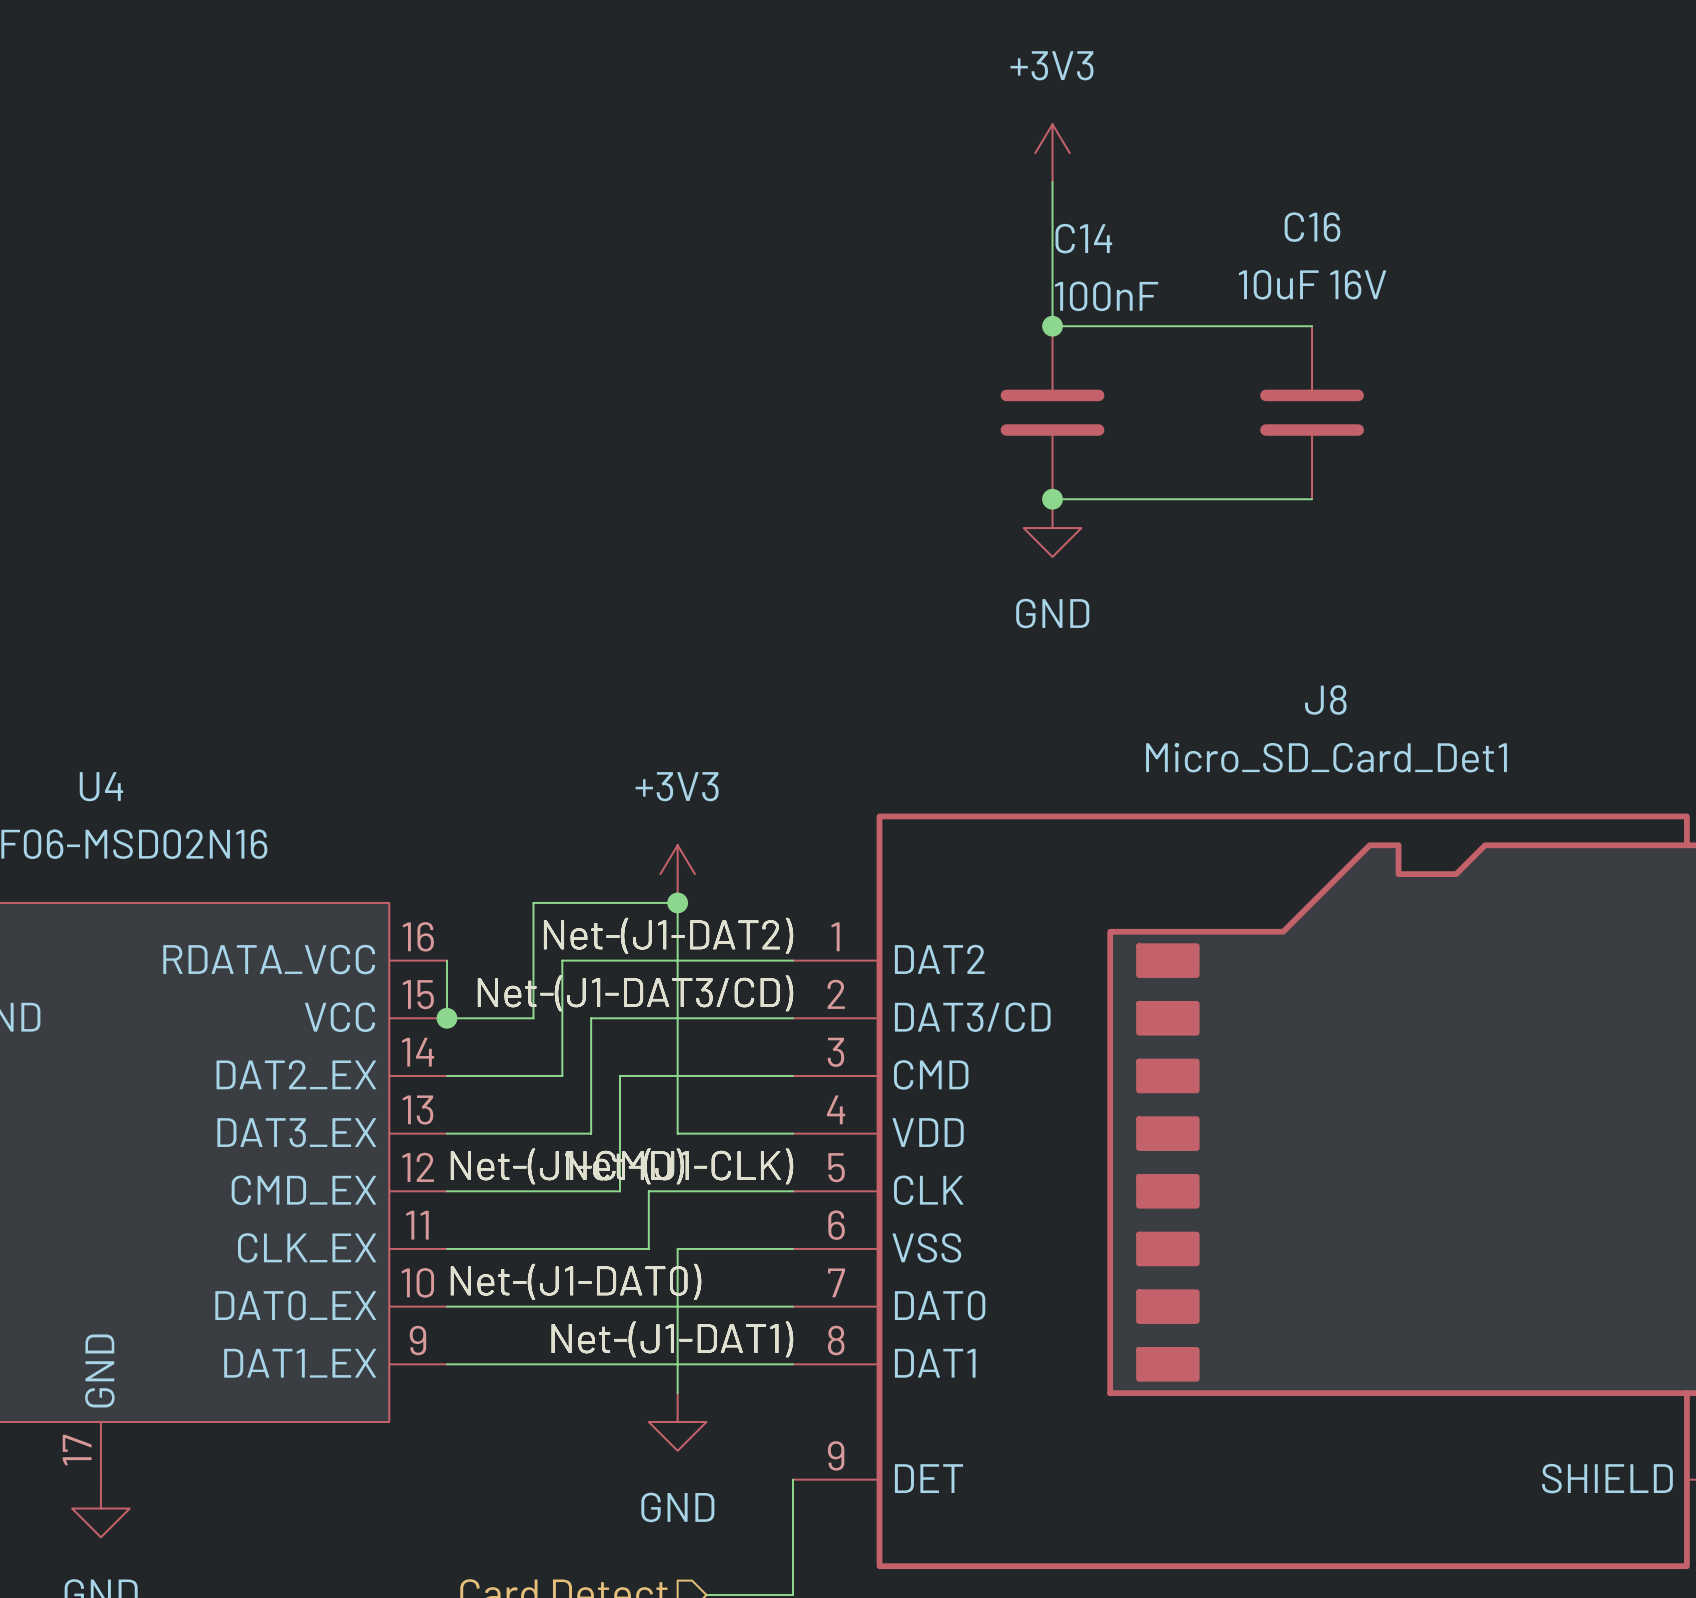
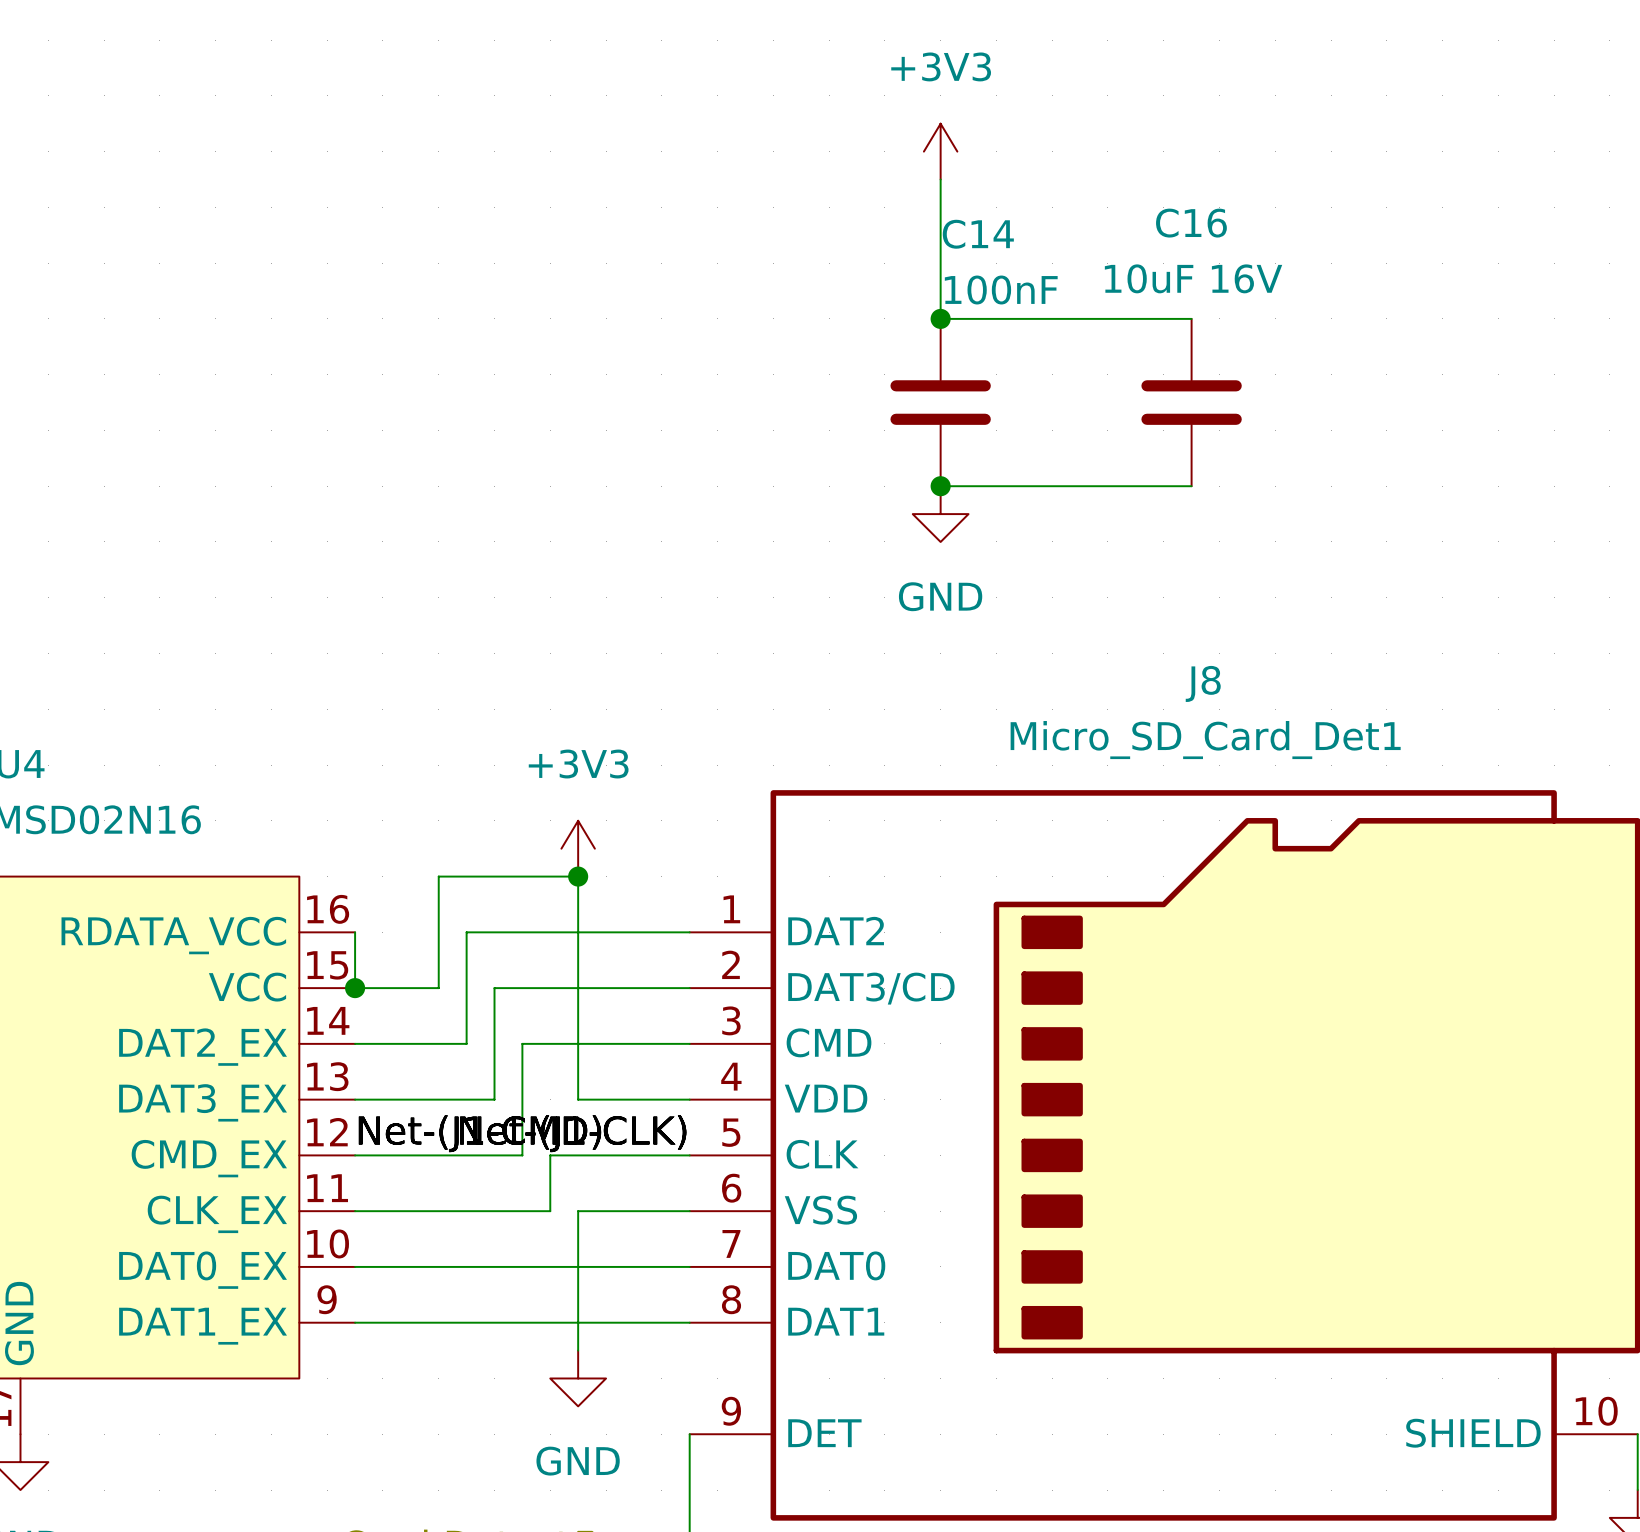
label: Net-(J1-DAT2) (668, 935) -> none
label: Net-(J1-DAT3/CD) (635, 993) -> none
label: Net-(J1-DAT0) (576, 1281) -> none
label: Net-(J1-DAT1) (672, 1339) -> none

